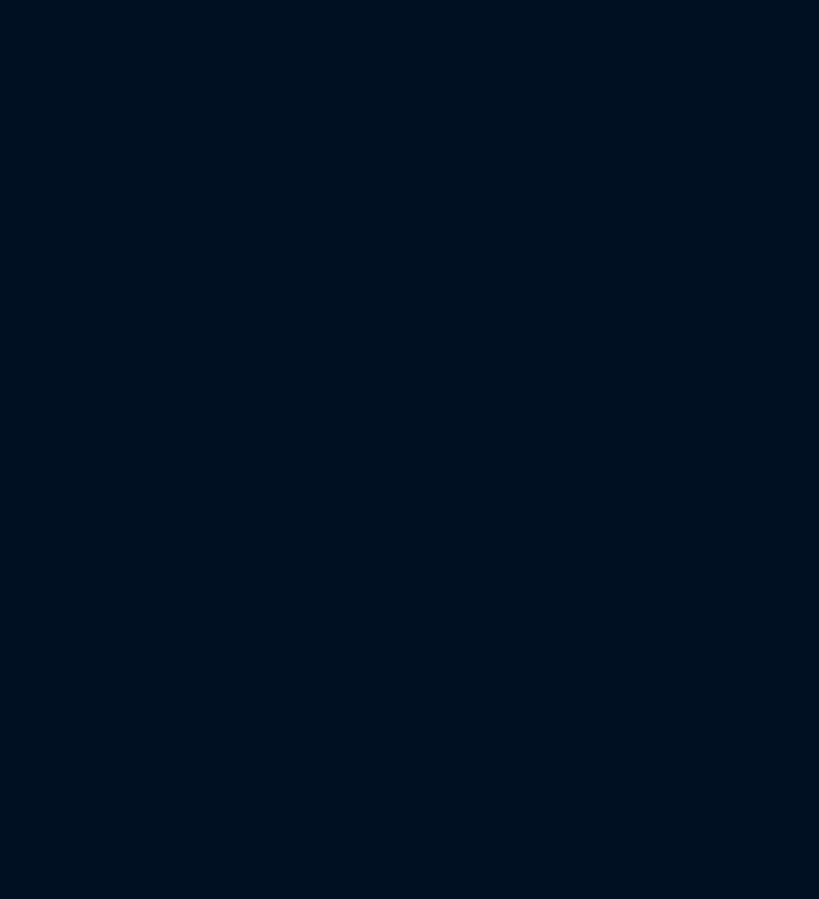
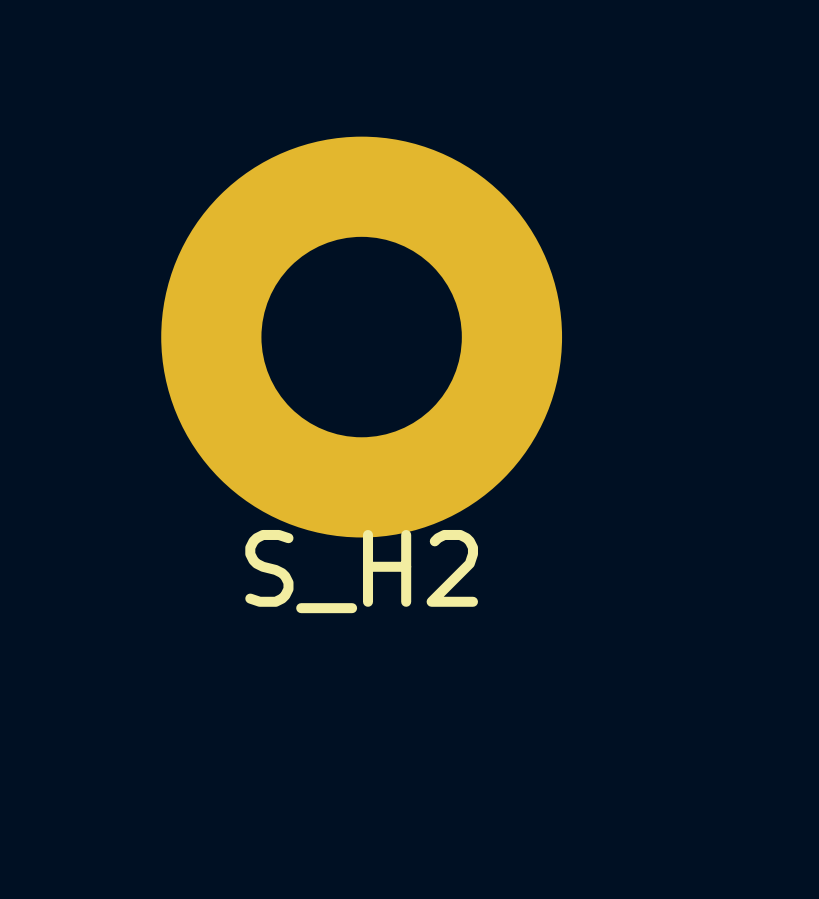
S_H2: none -> (361, 337)

